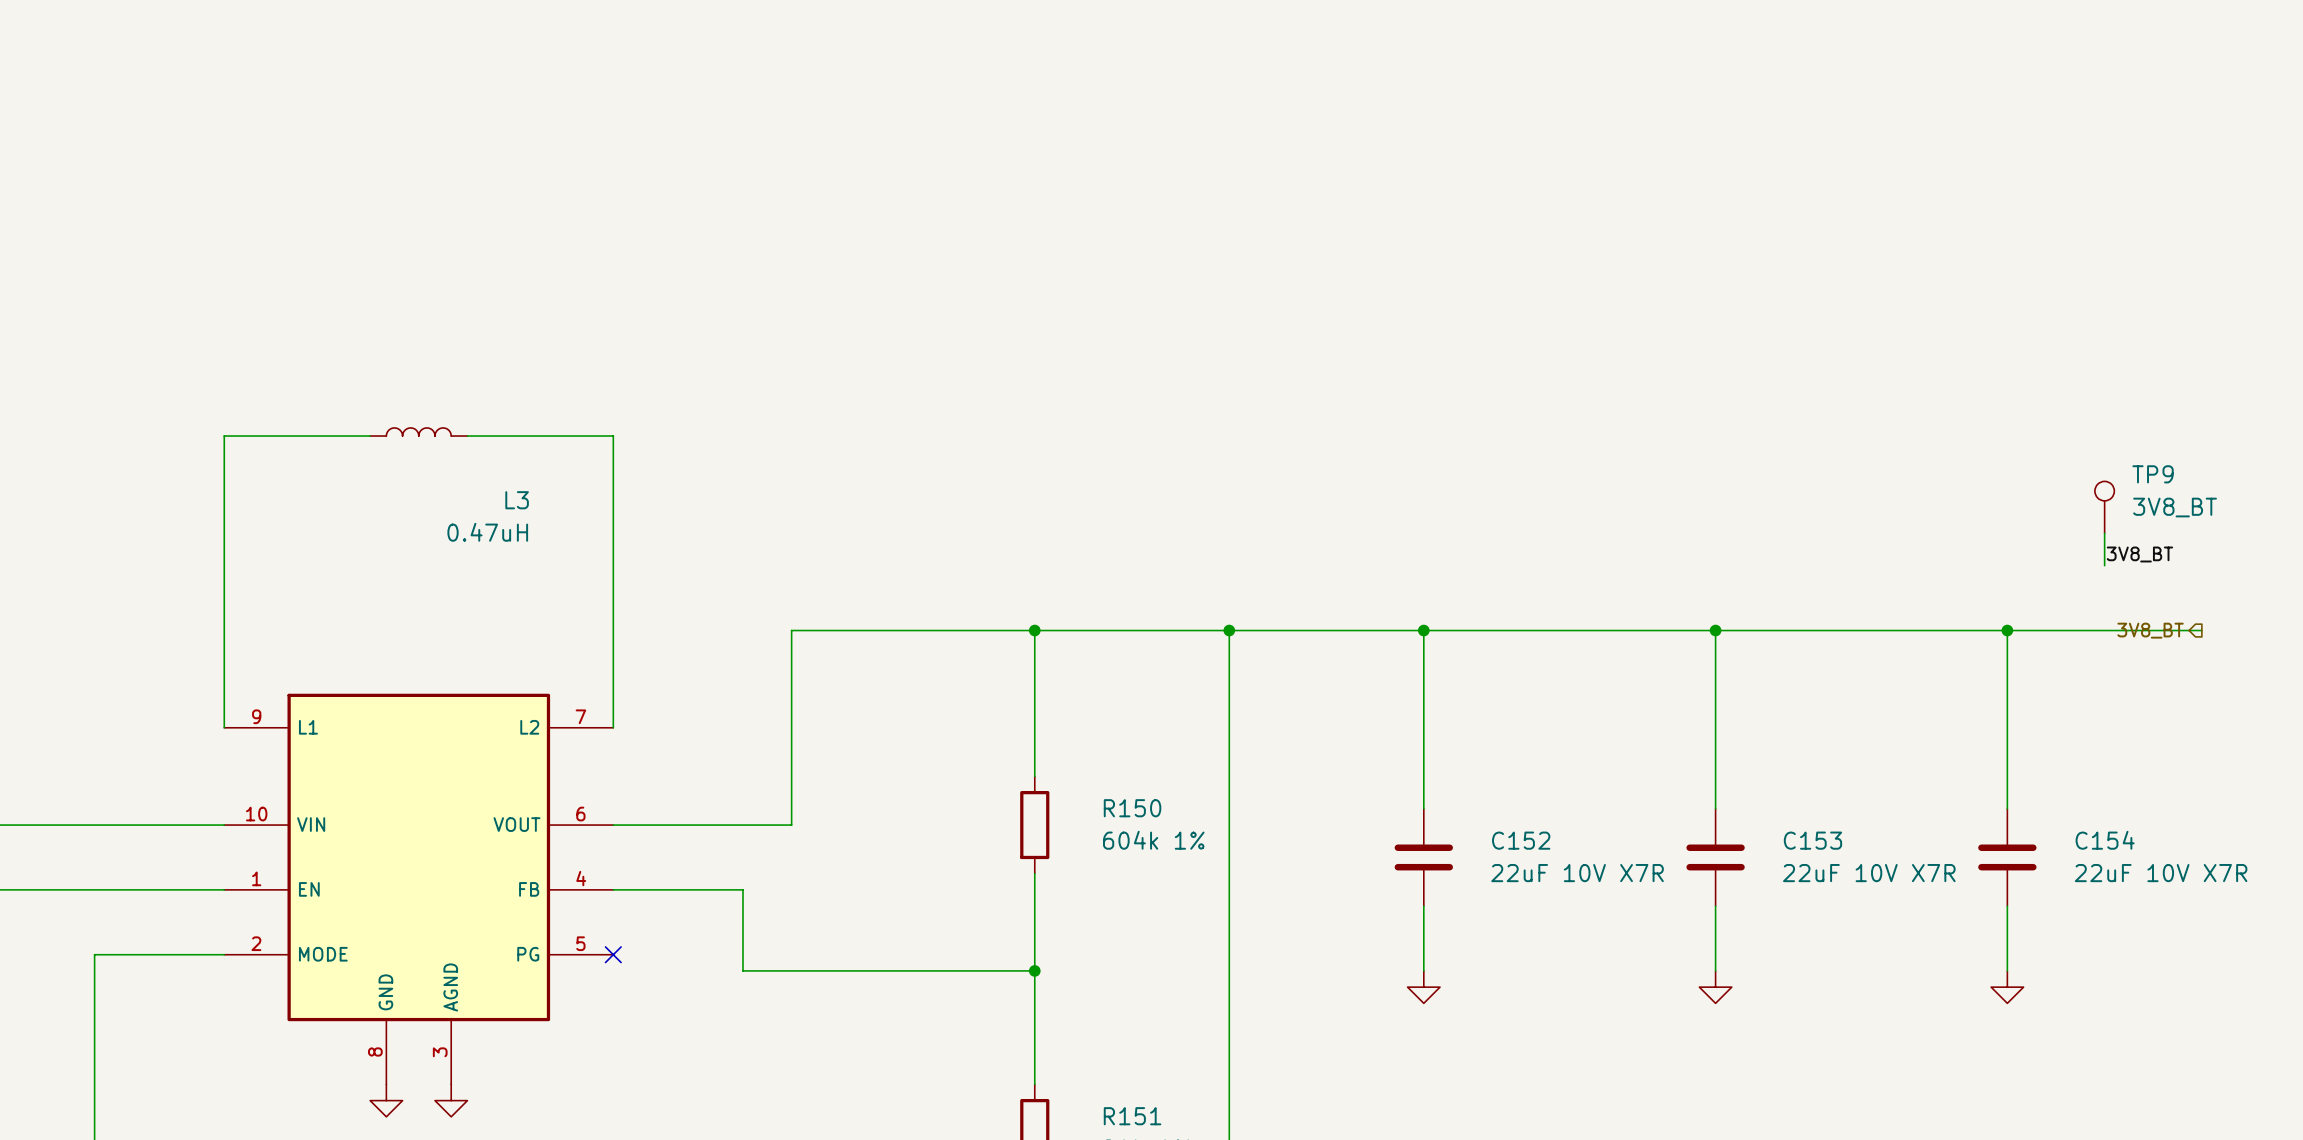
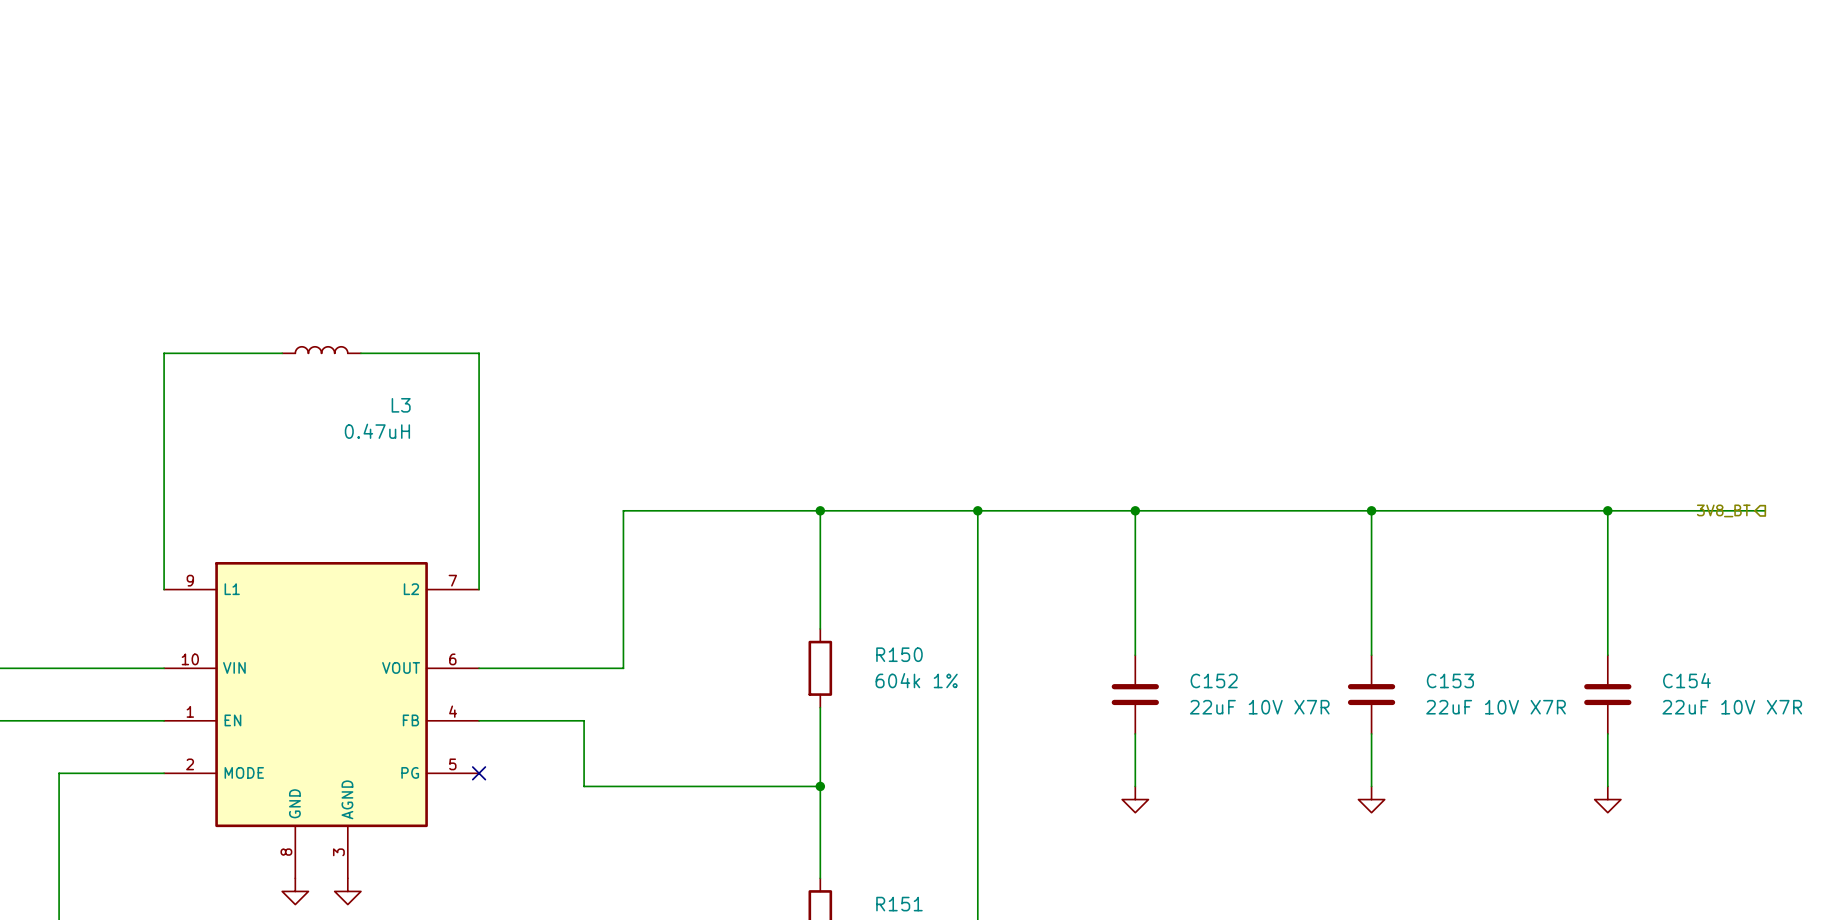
TP9: 3V8_BT (2104, 507) -> none
wire: (2104, 533) (2104, 565) -> none
label: 3V8_BT (2139, 554) -> none

